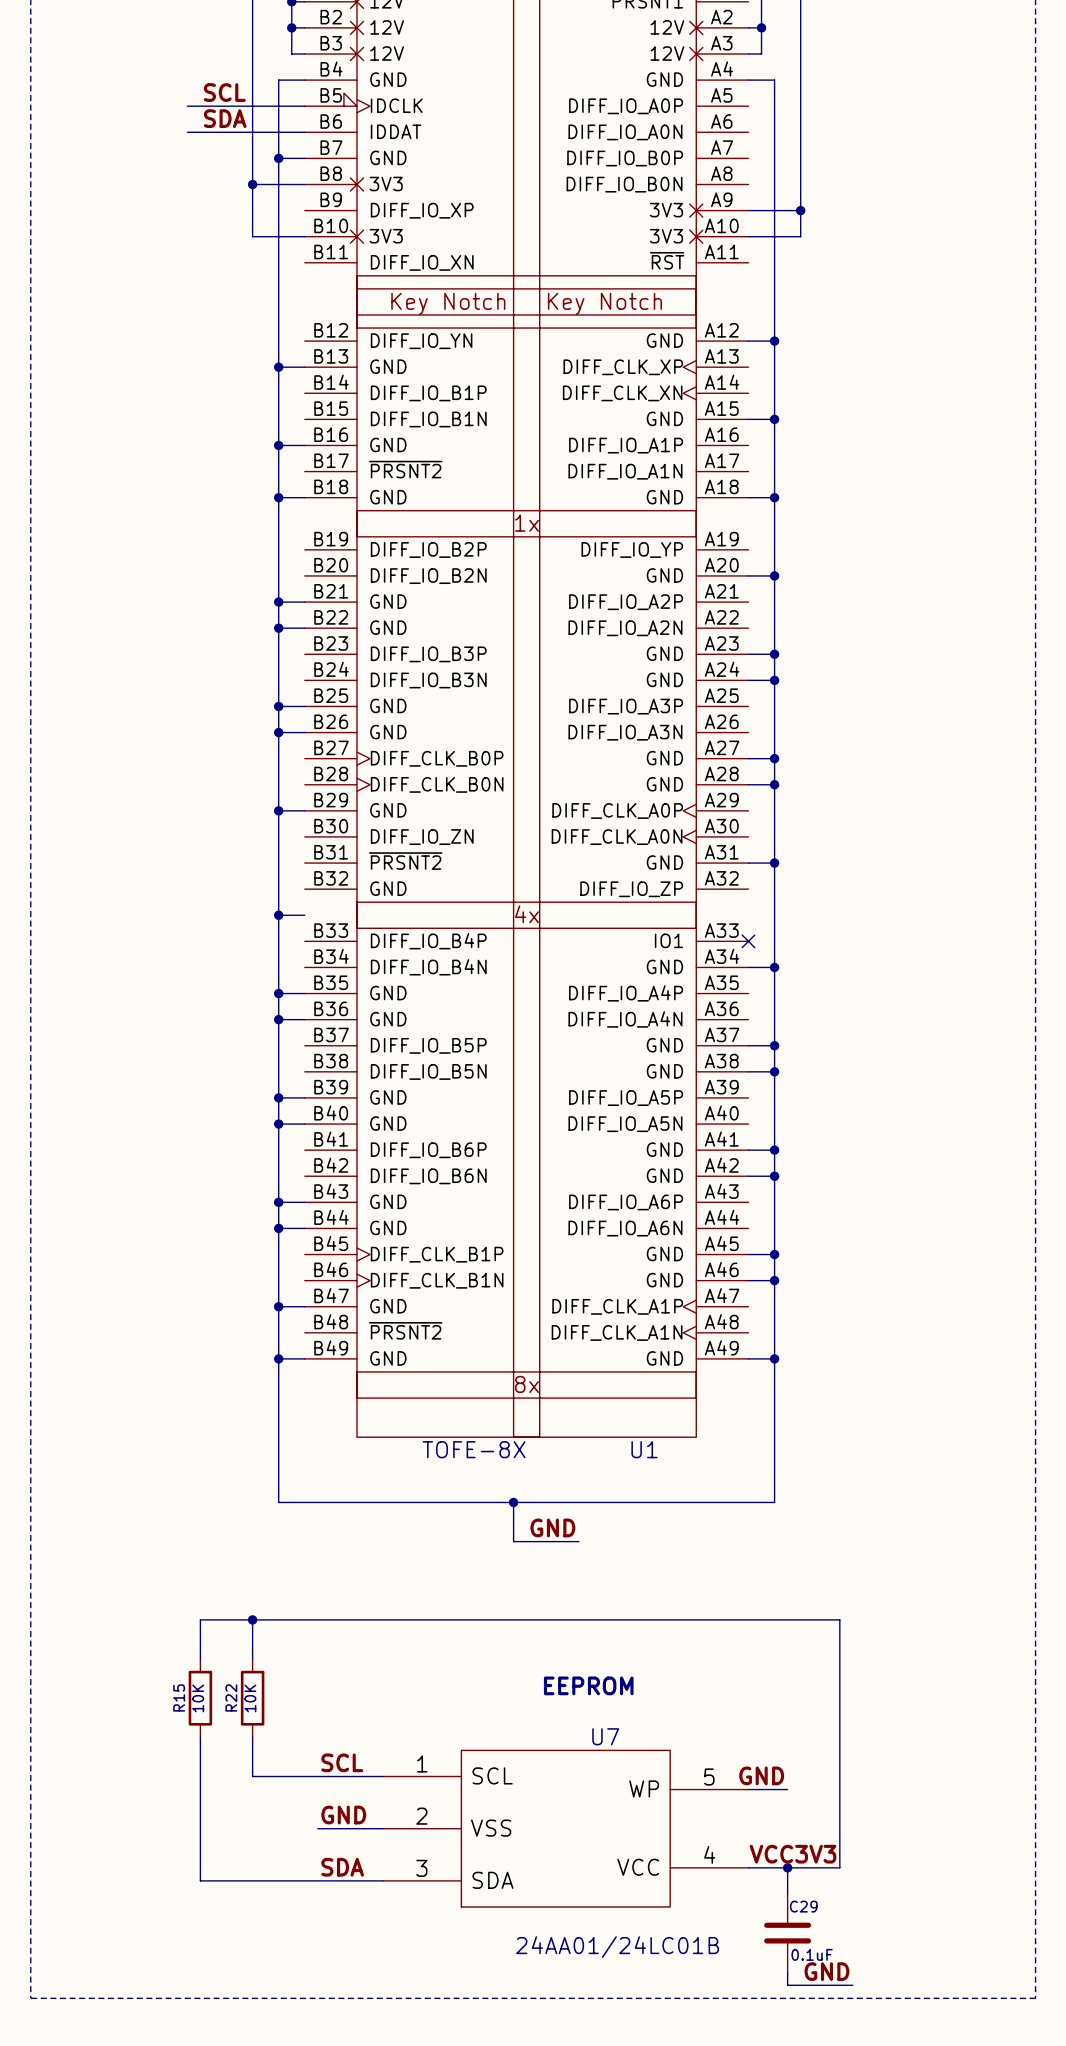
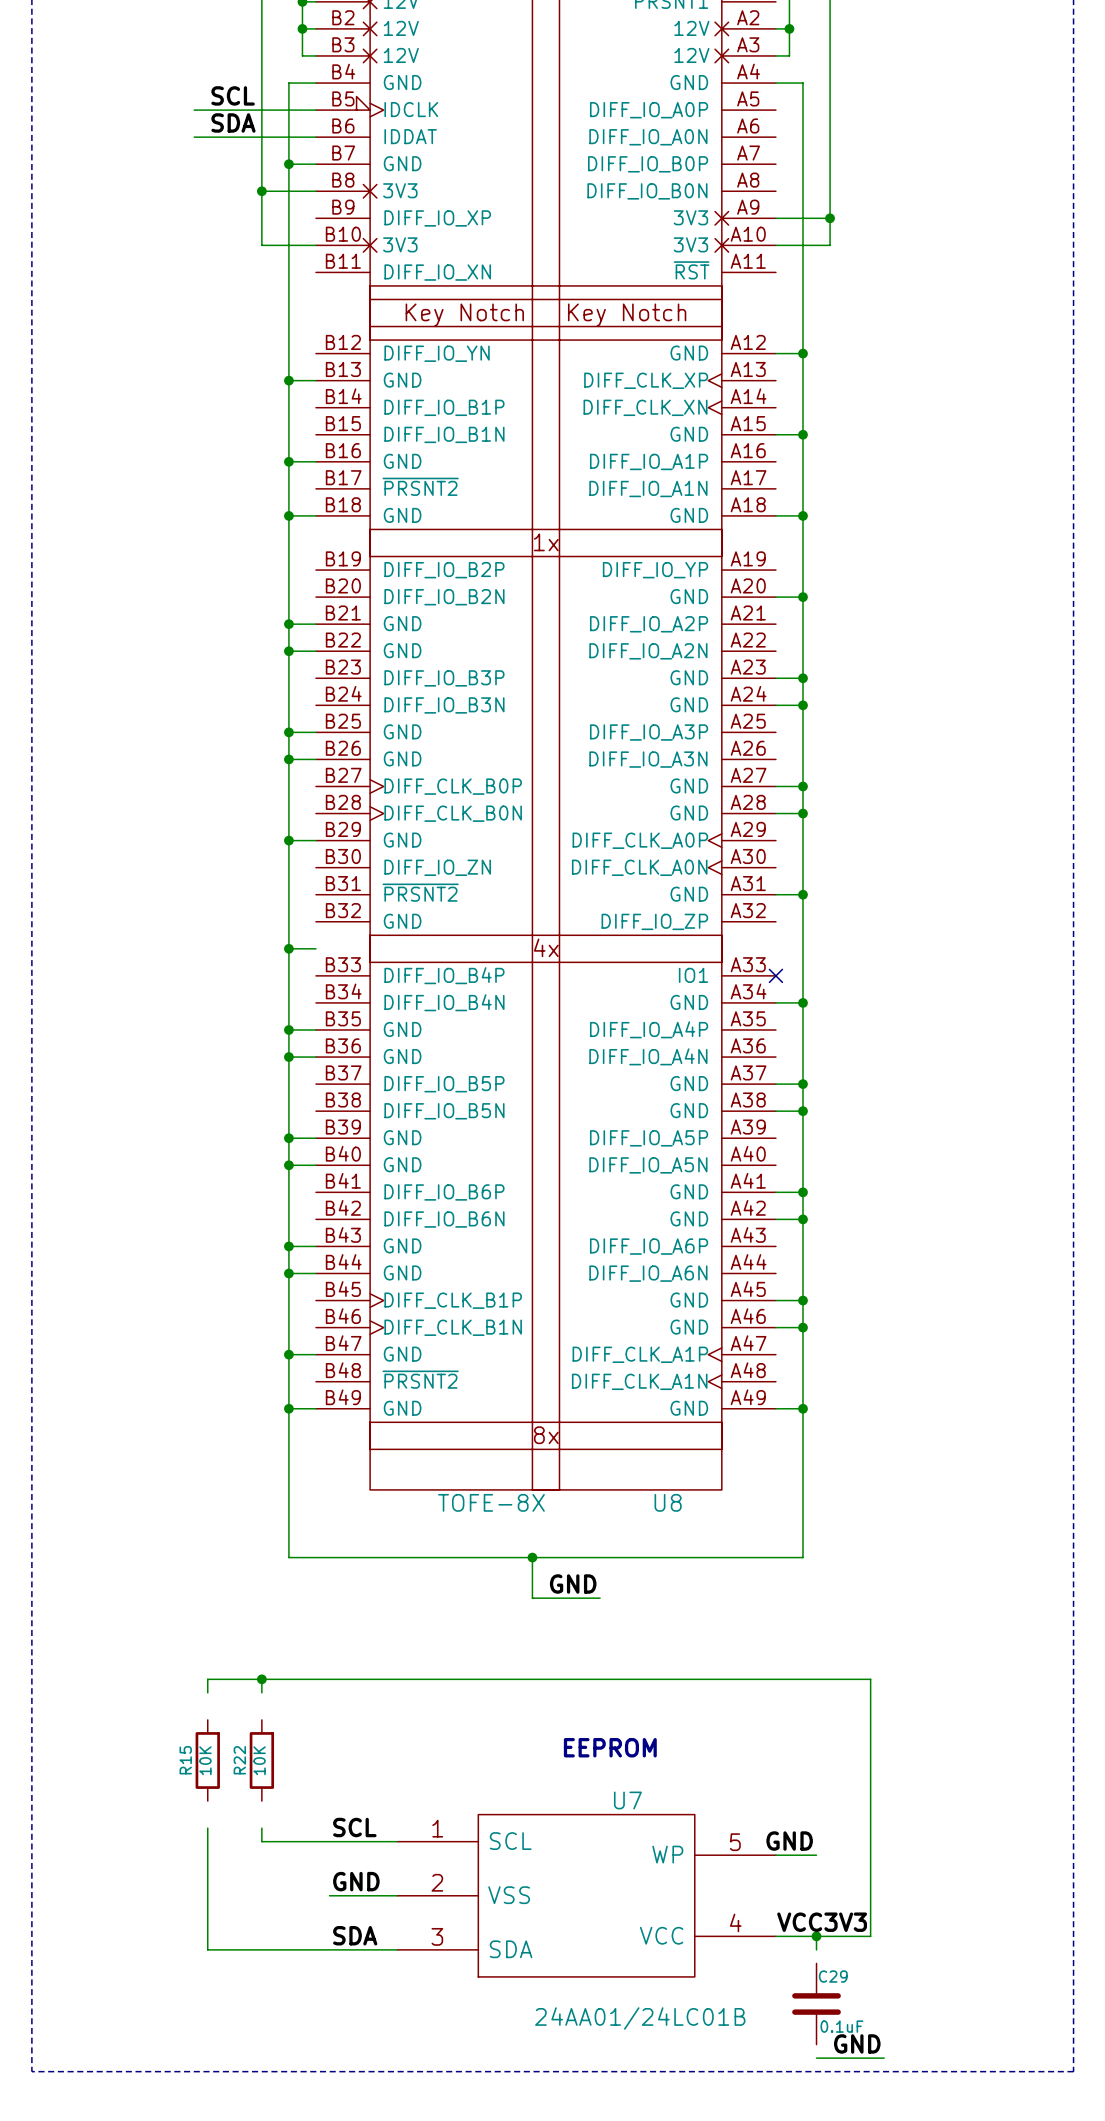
U1 name: U1 (644, 1449) -> U8 (668, 1502)
wire: (200, 1632) (200, 1659) -> none
wire: (252, 1632) (252, 1659) -> none
wire: (200, 1737) (200, 1763) -> none
wire: (252, 1737) (252, 1763) -> none
wire: (787, 1880) (787, 1893) -> none
wire: (787, 1972) (787, 1985) -> none

